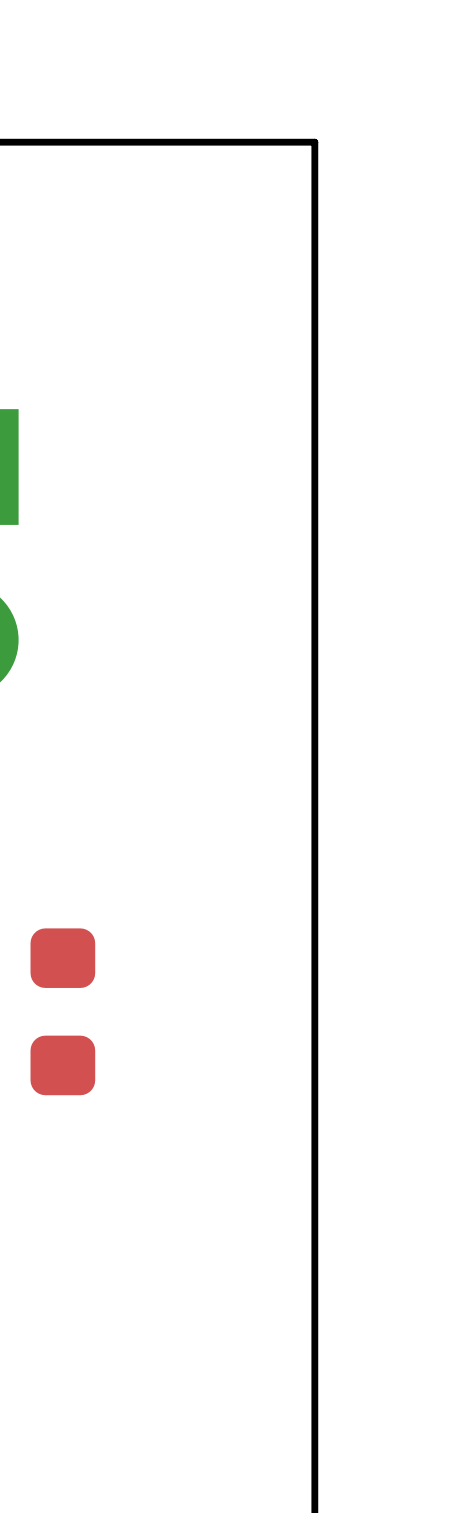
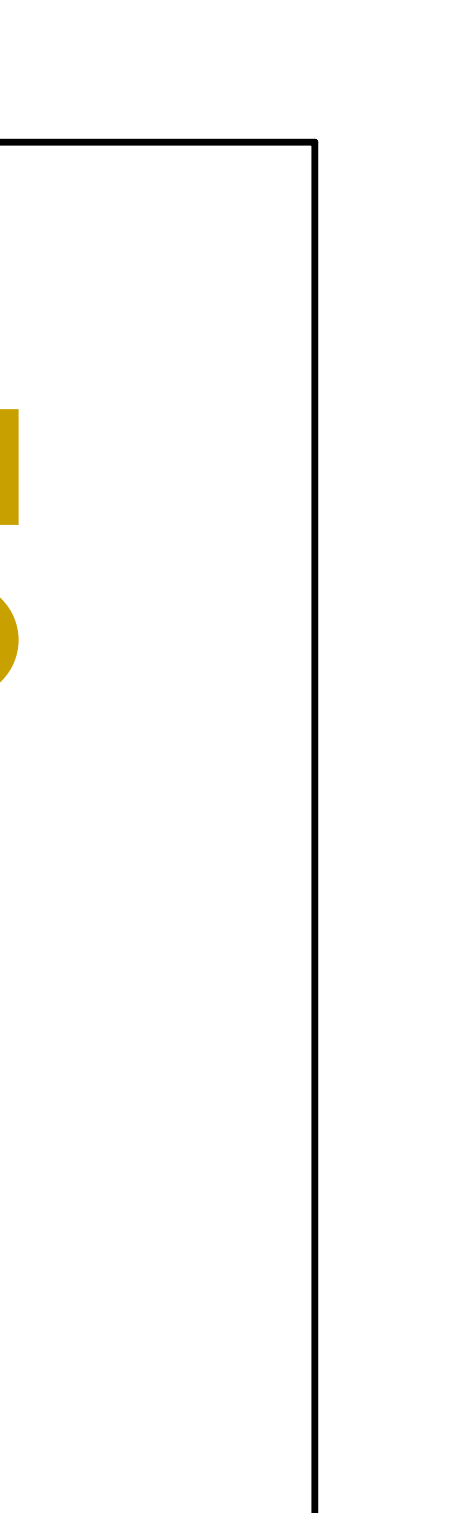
part: (62, 1011) -> none

